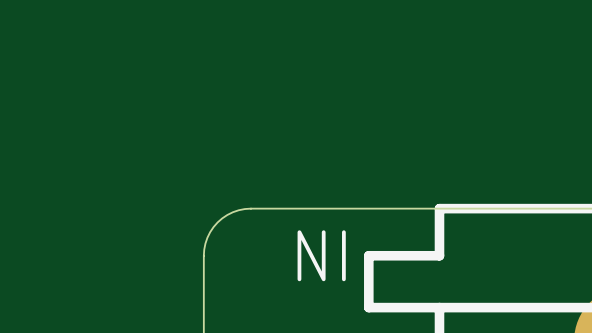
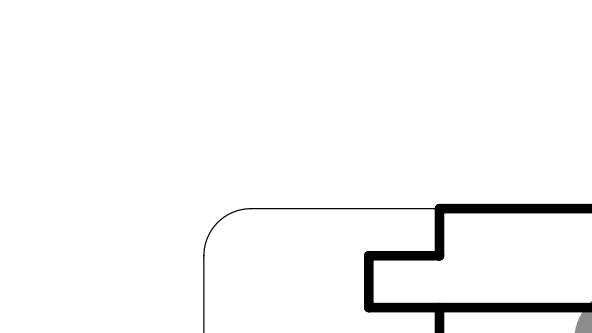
text: NI (321, 255) -> none

